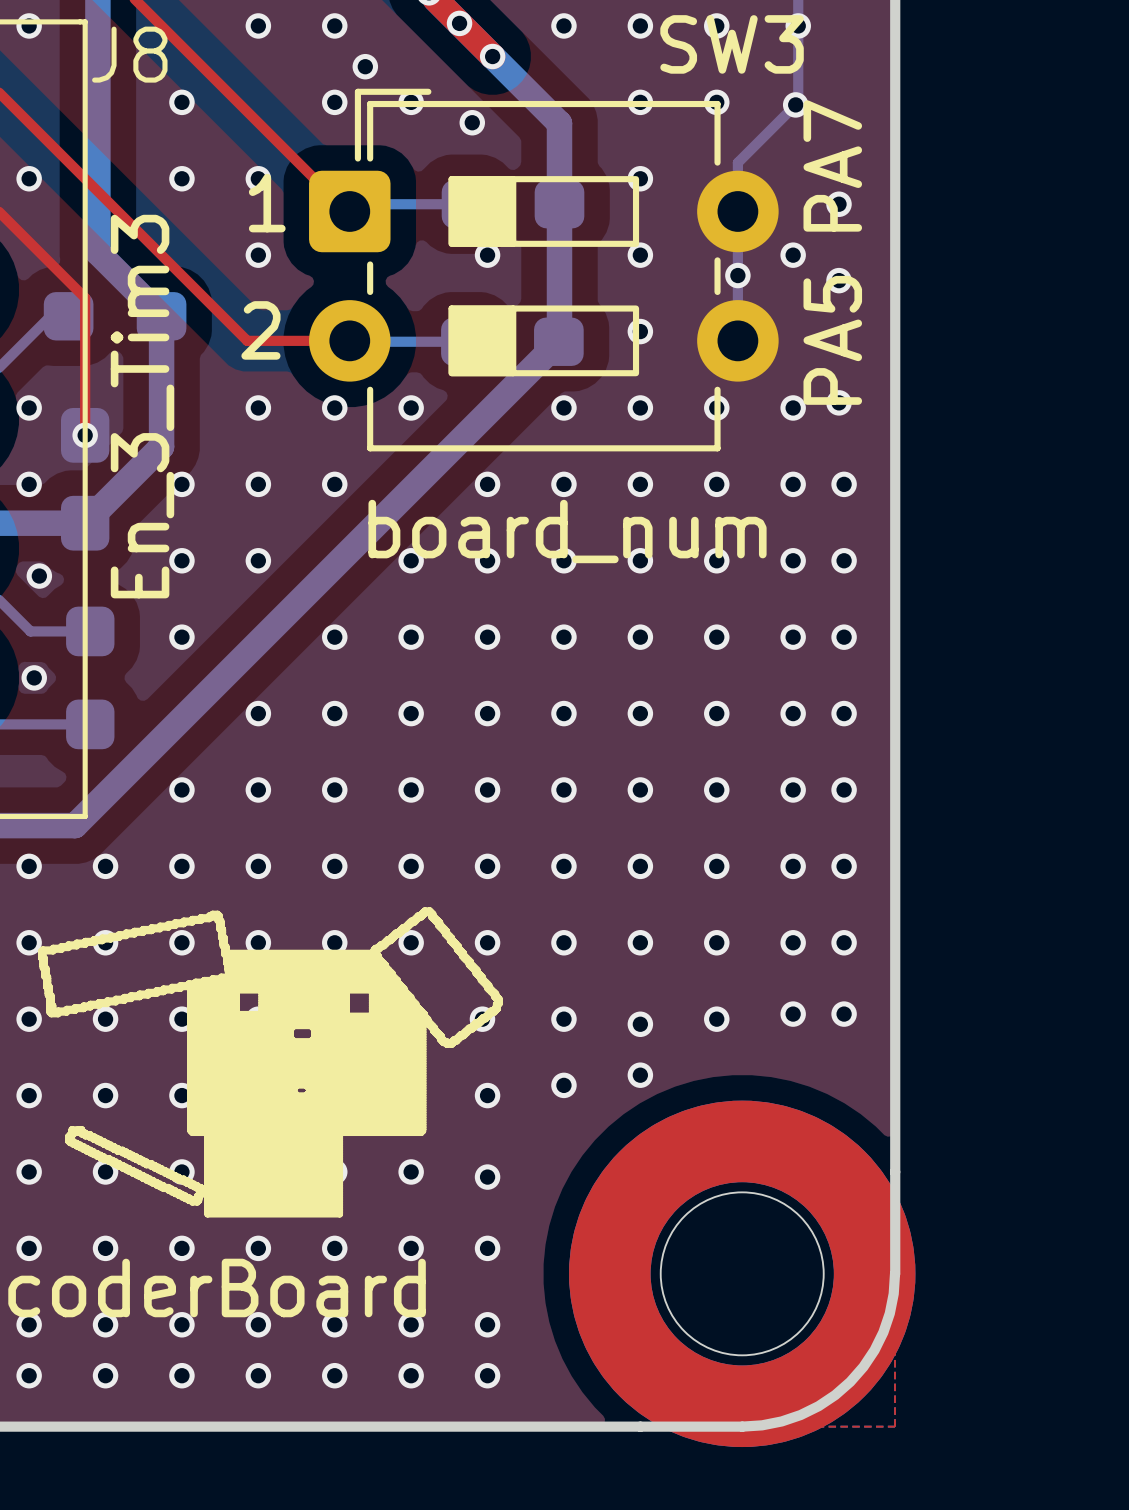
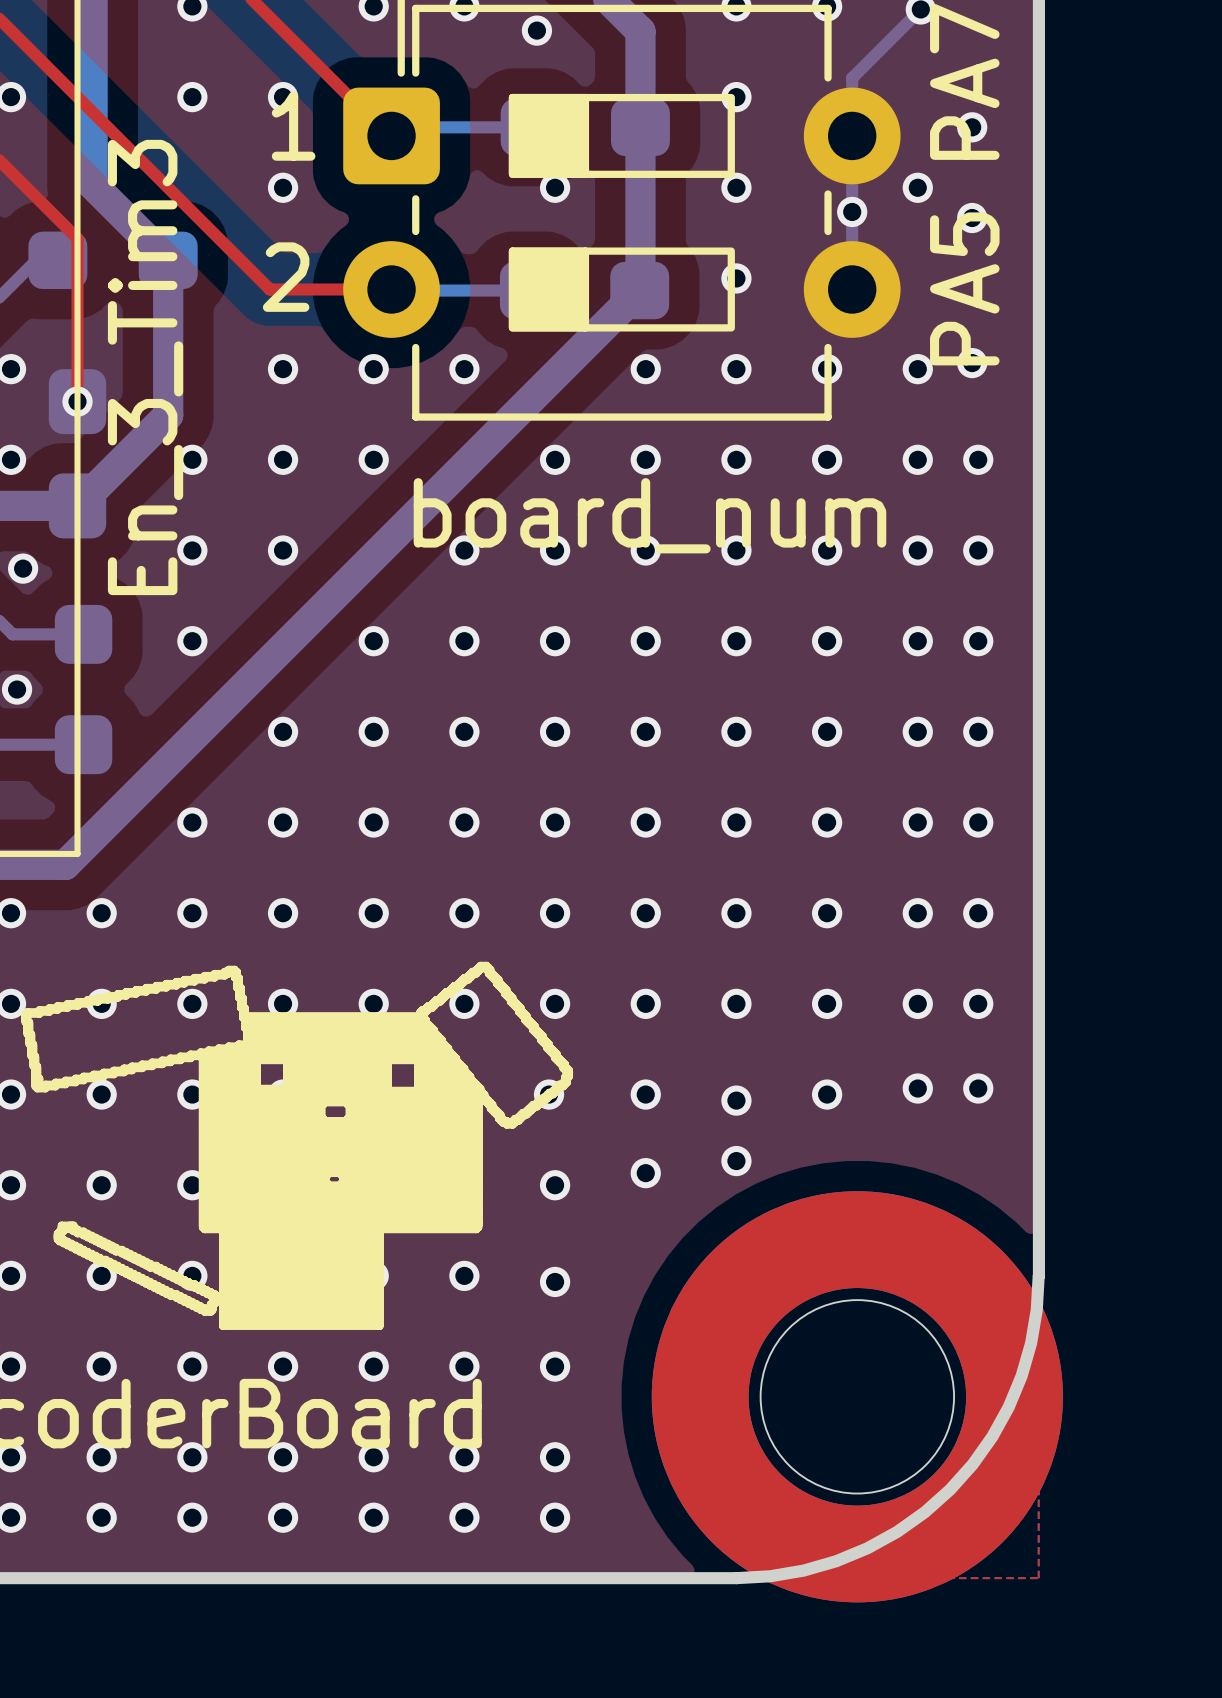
board edge: (895, 1171) (895, 1273) (889, 1313) (874, 1350) (850, 1381) (818, 1406) (781, 1421) (742, 1426) (640, 1426) -> (1038, 1275) (1036, 1309) (1031, 1343) (1021, 1375) (1008, 1407) (992, 1436) (972, 1464) (950, 1489) (924, 1512) (897, 1531) (867, 1548) (836, 1561) (803, 1570) (770, 1576) (736, 1578)

